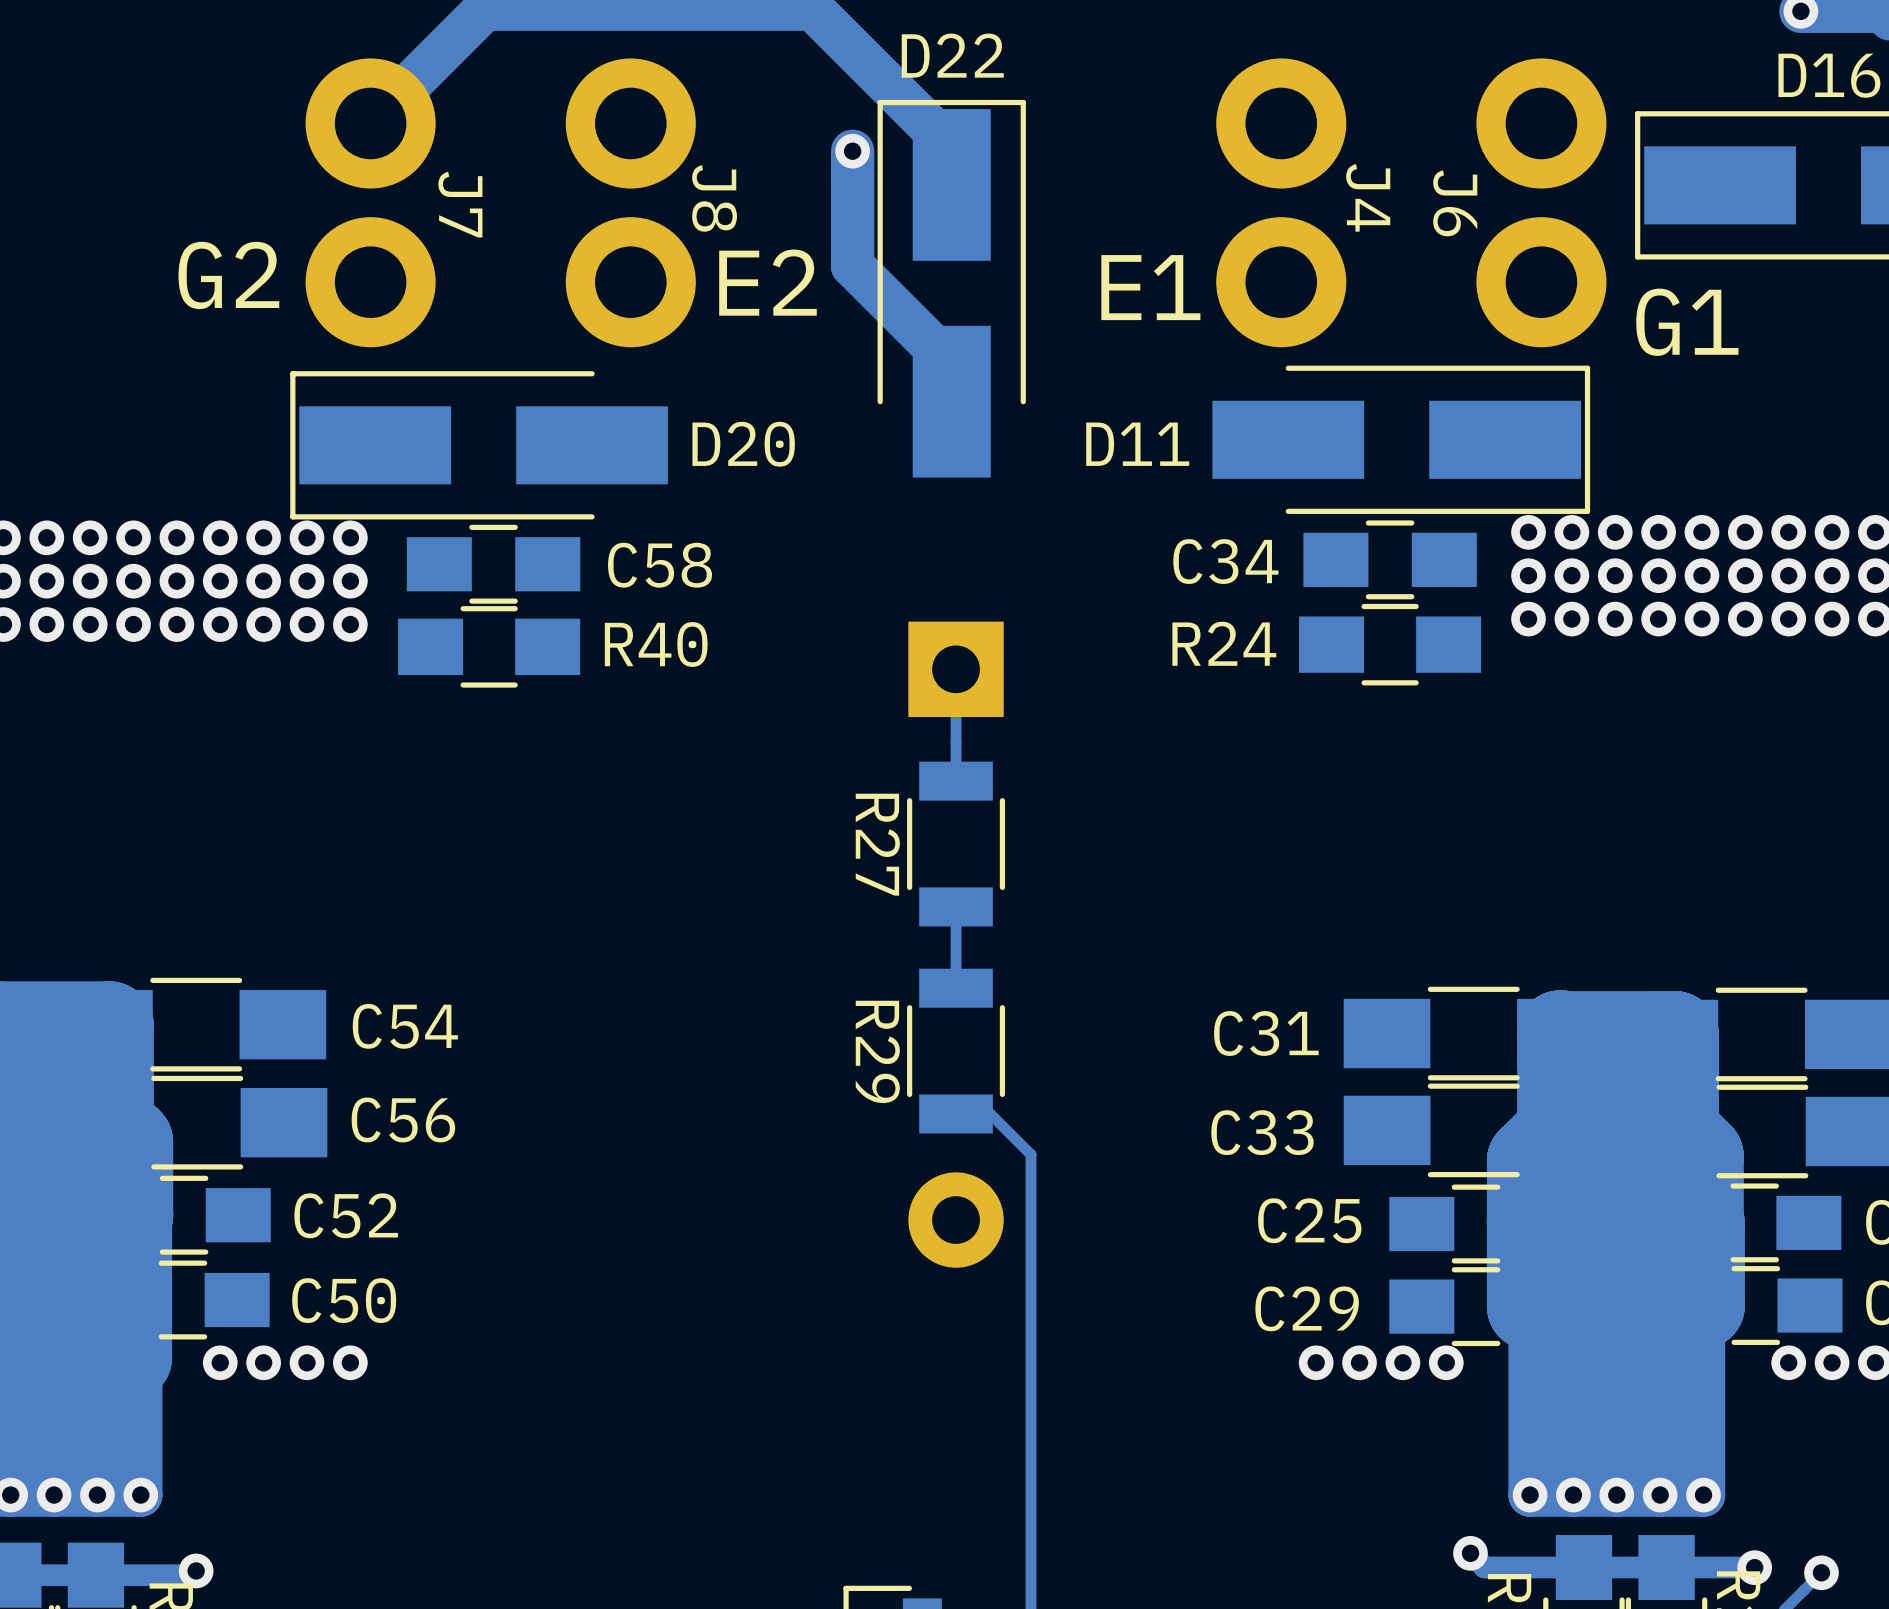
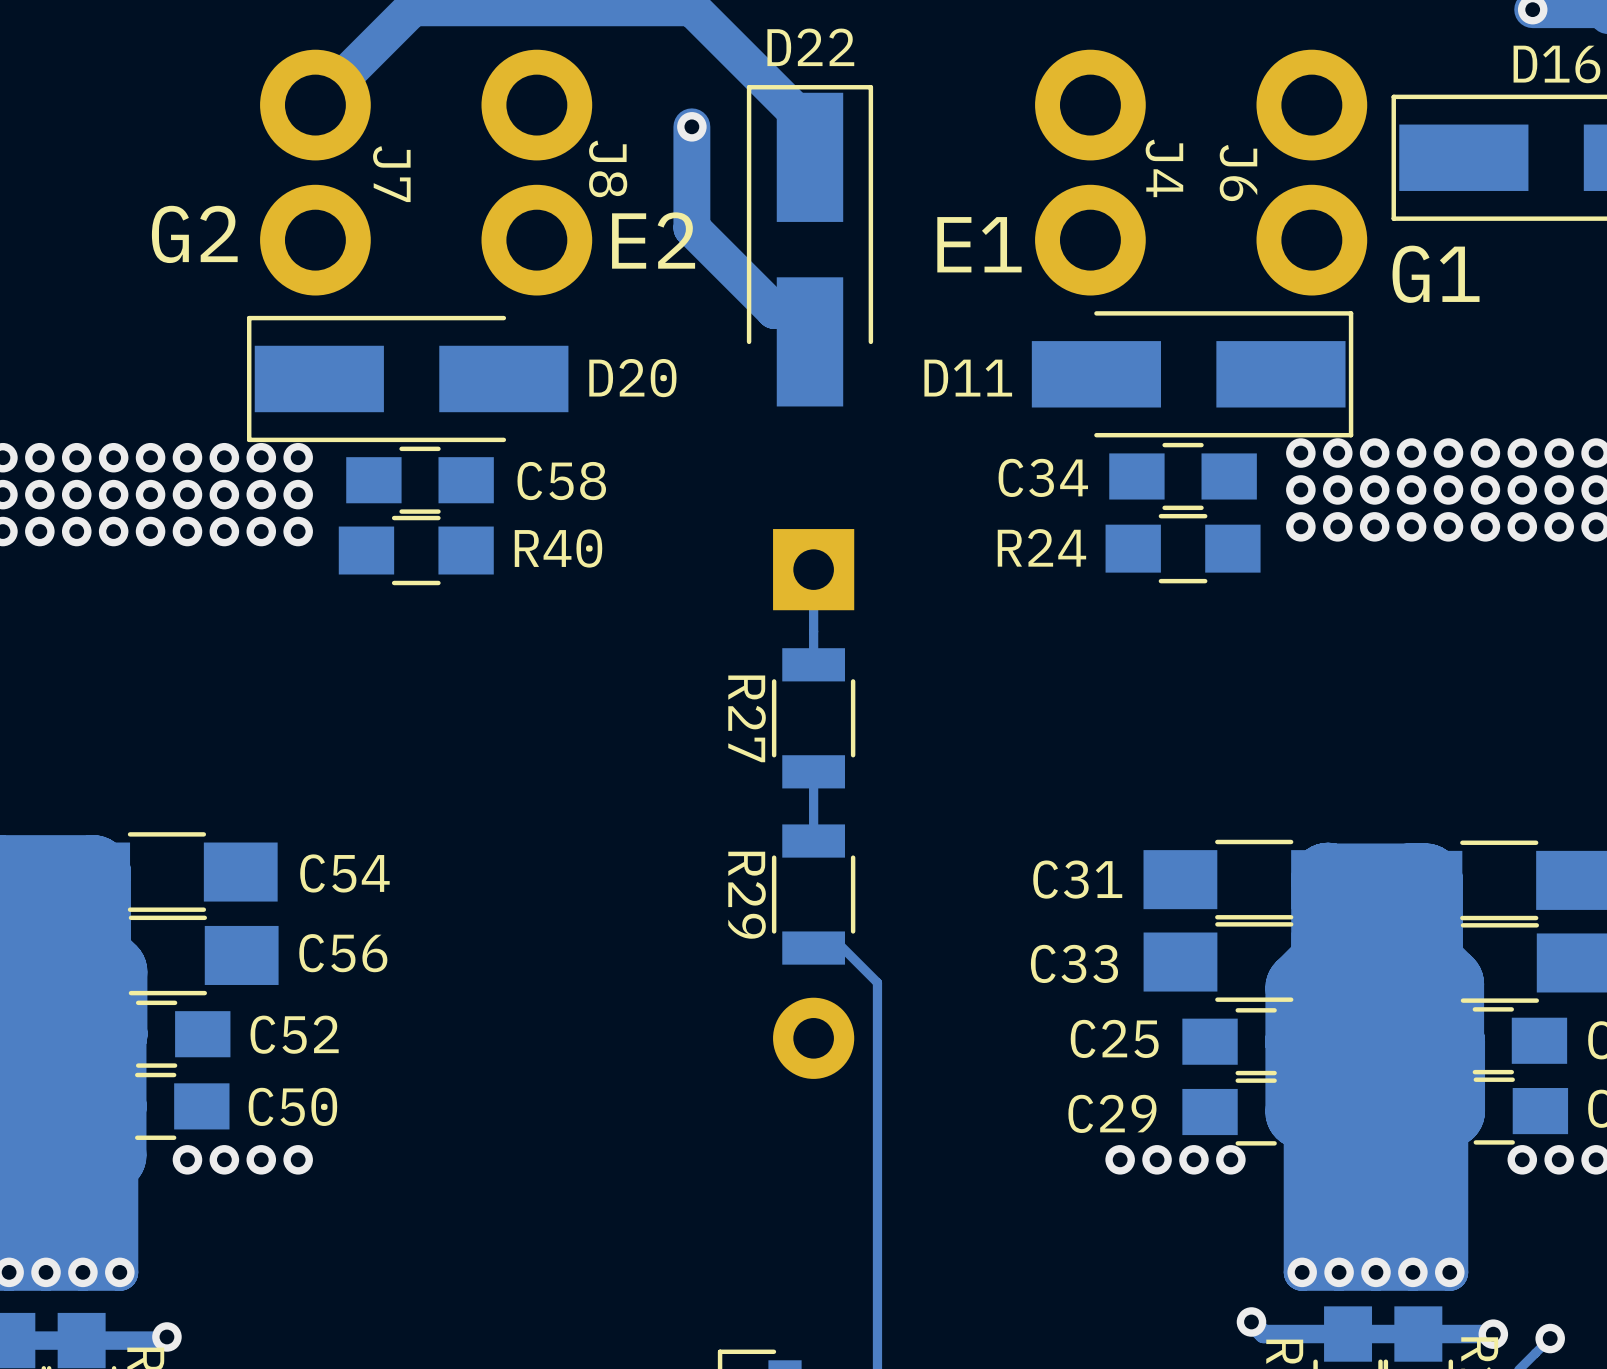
track: (852, 151) (852, 265) (951, 364) -> (691, 126) (691, 228) (774, 310) (809, 310)
via position: (852, 151) -> (691, 126)

